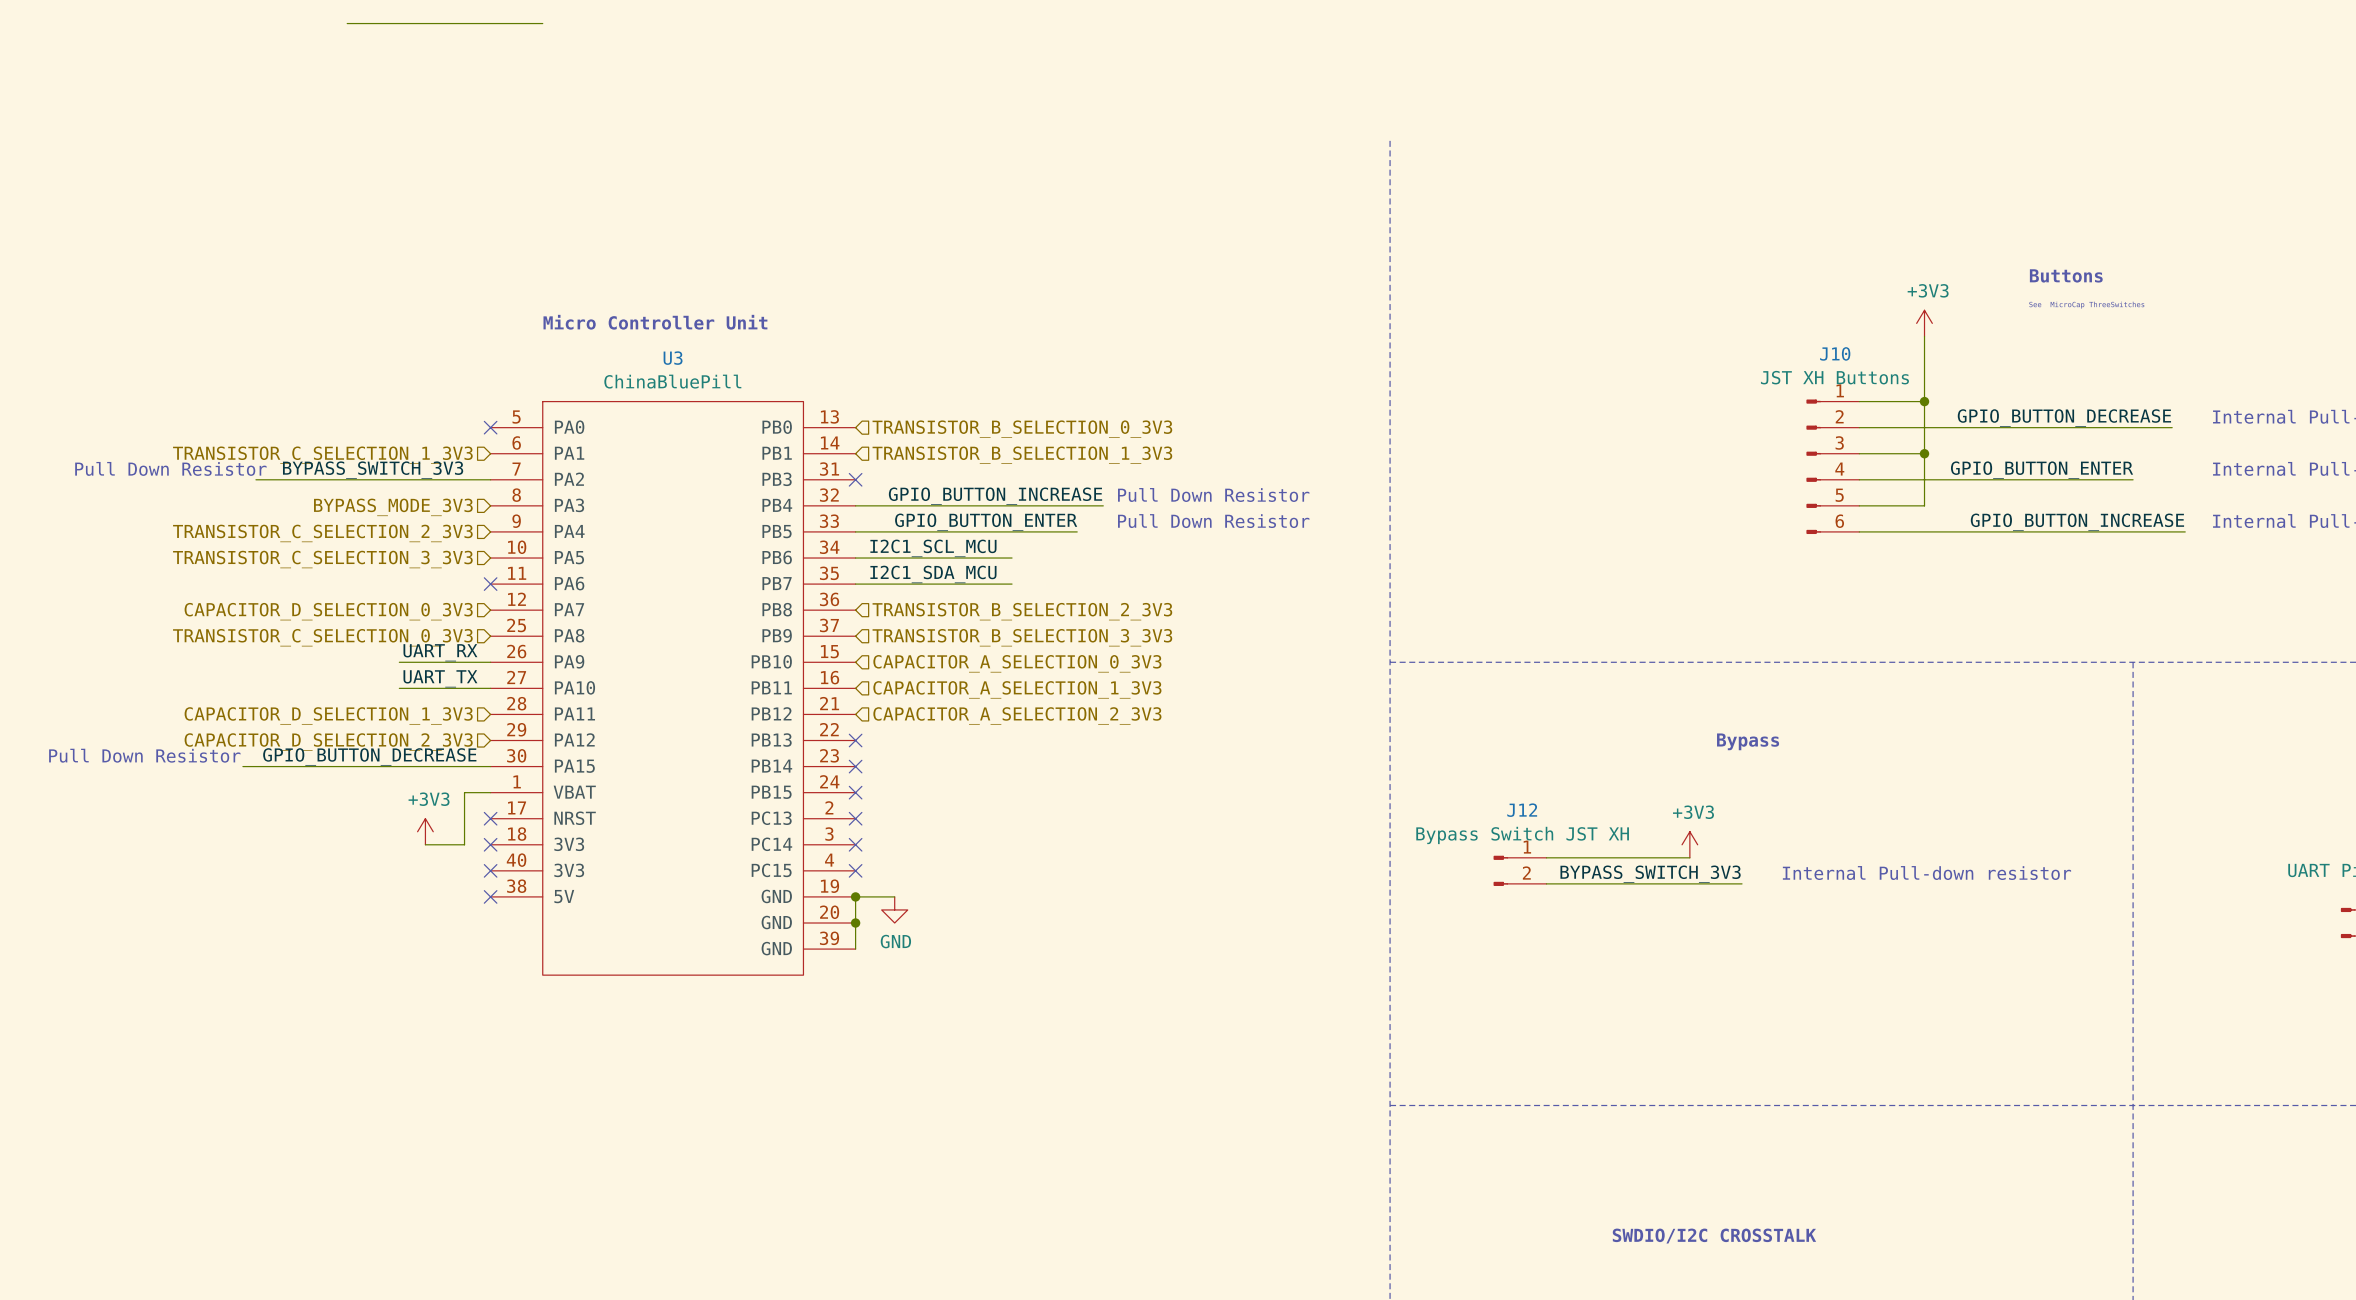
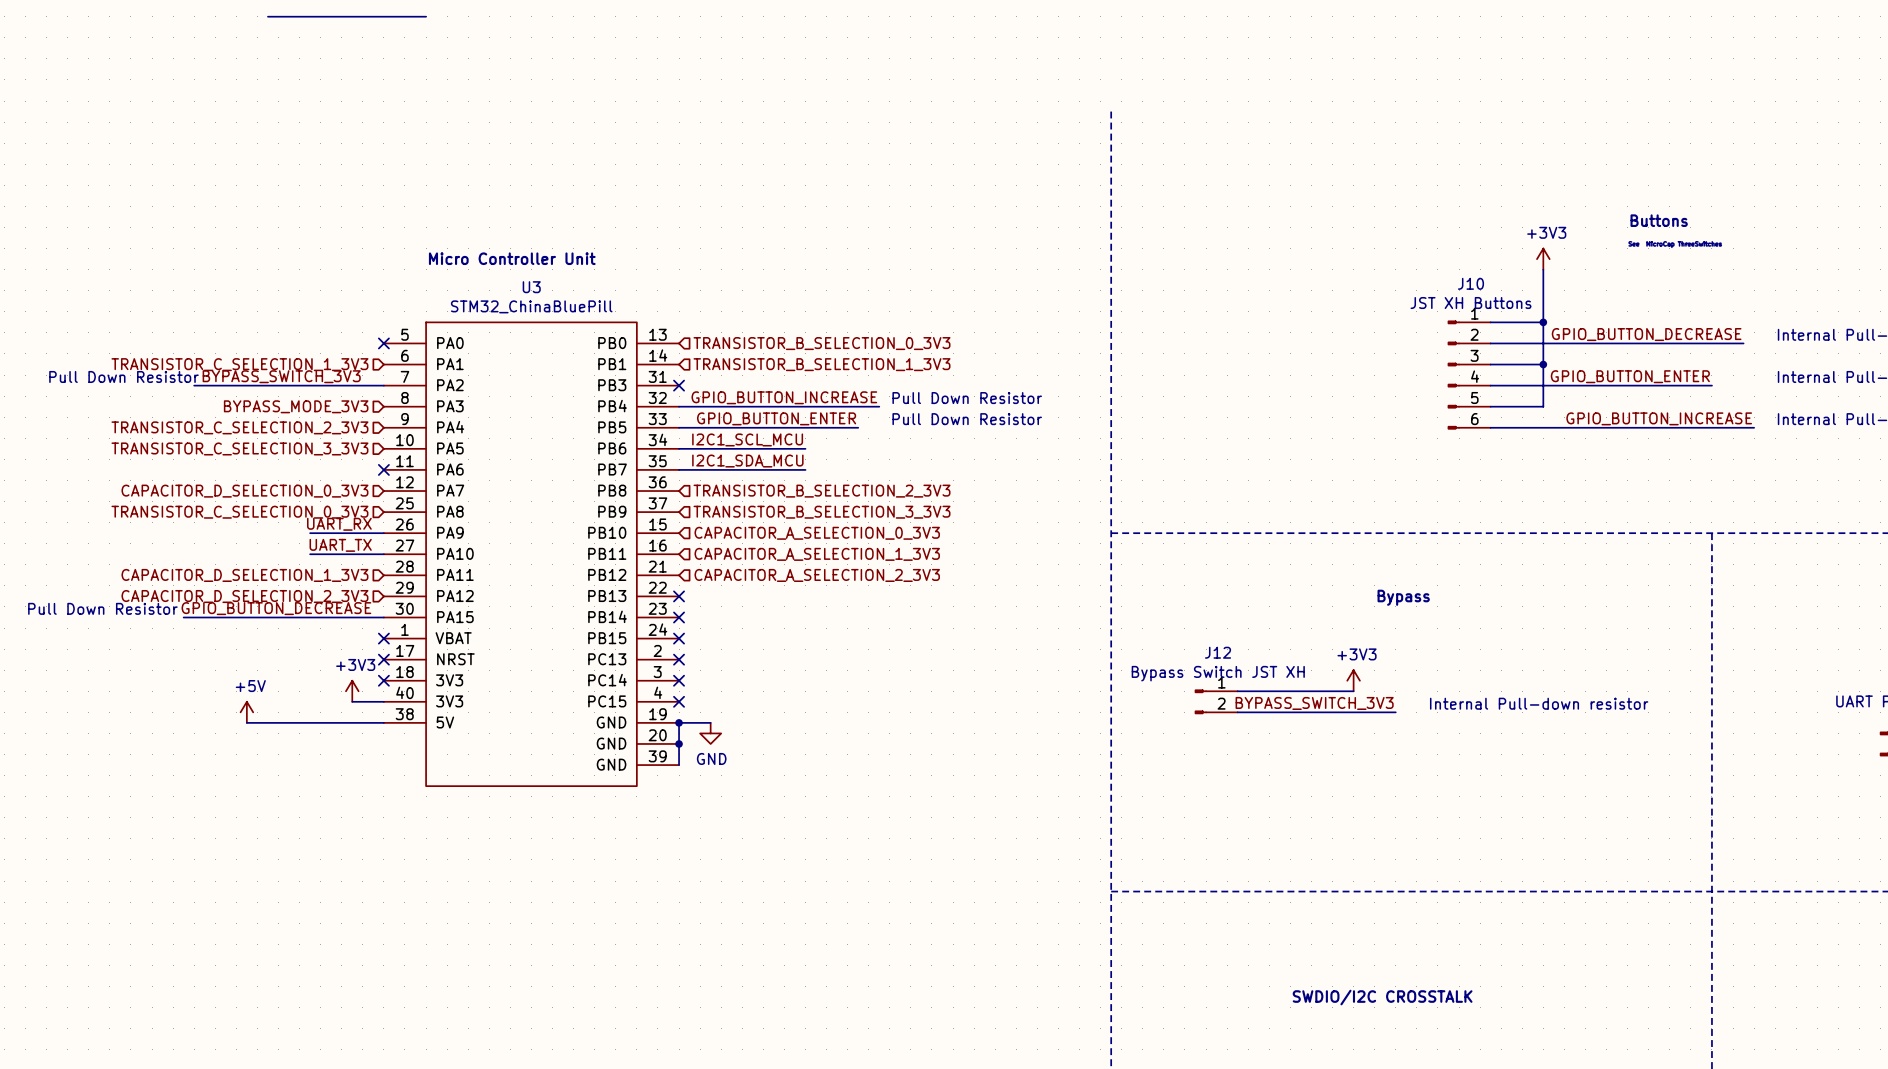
U3 value: ChinaBluePill (672, 381) -> STM32_ChinaBluePill (531, 306)
wire: (490, 792) (464, 792) (464, 844) (425, 844) -> none
no-connect mark: none -> (383, 638)
power symbol position: +3V3 (425, 831) -> +3V3 (352, 691)
wire: none -> (352, 701) (383, 701)
no-connect mark: (490, 870) -> none
power symbol: none -> +5V (246, 712)
wire: none -> (246, 722) (383, 722)
no-connect mark: (490, 896) -> none

